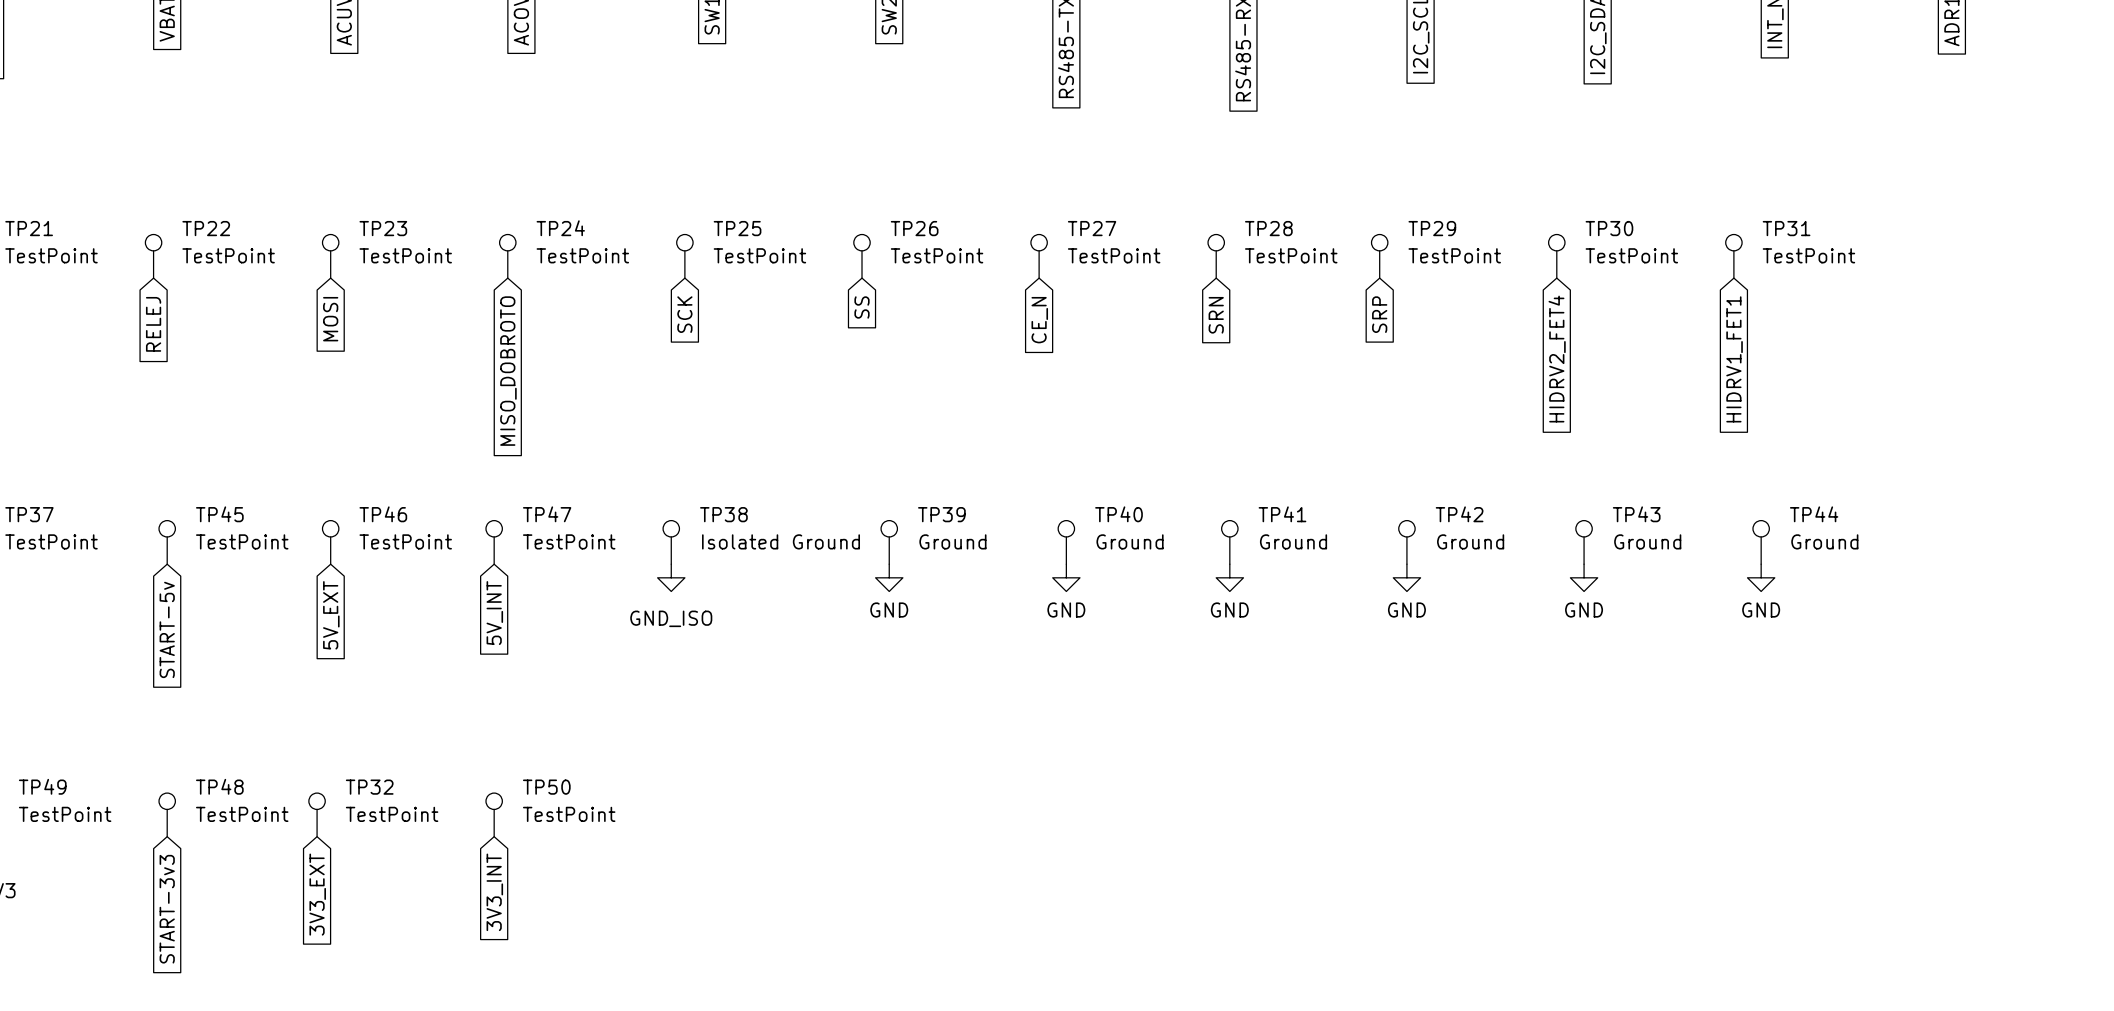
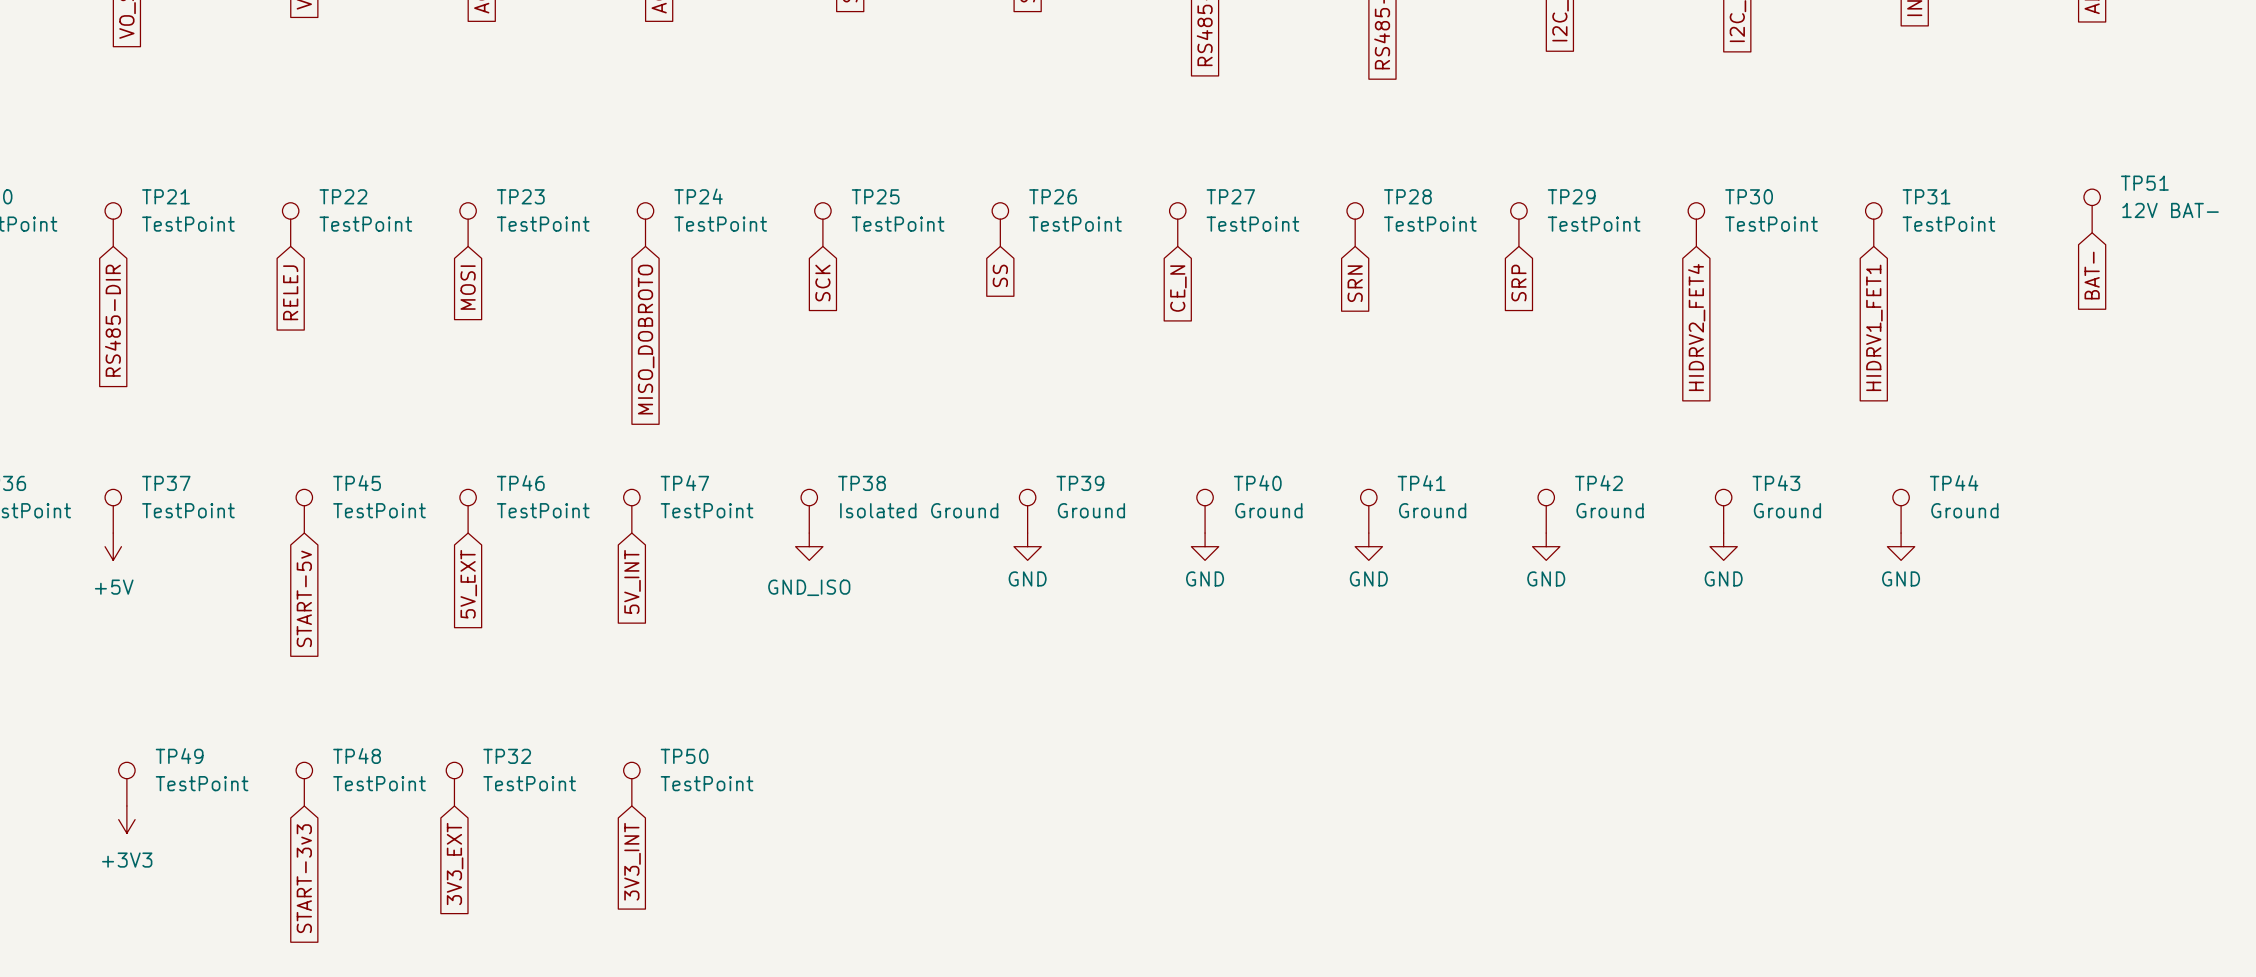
TP51: none -> 12V BAT- (2092, 210)
global label: none -> BAT- (2092, 275)

